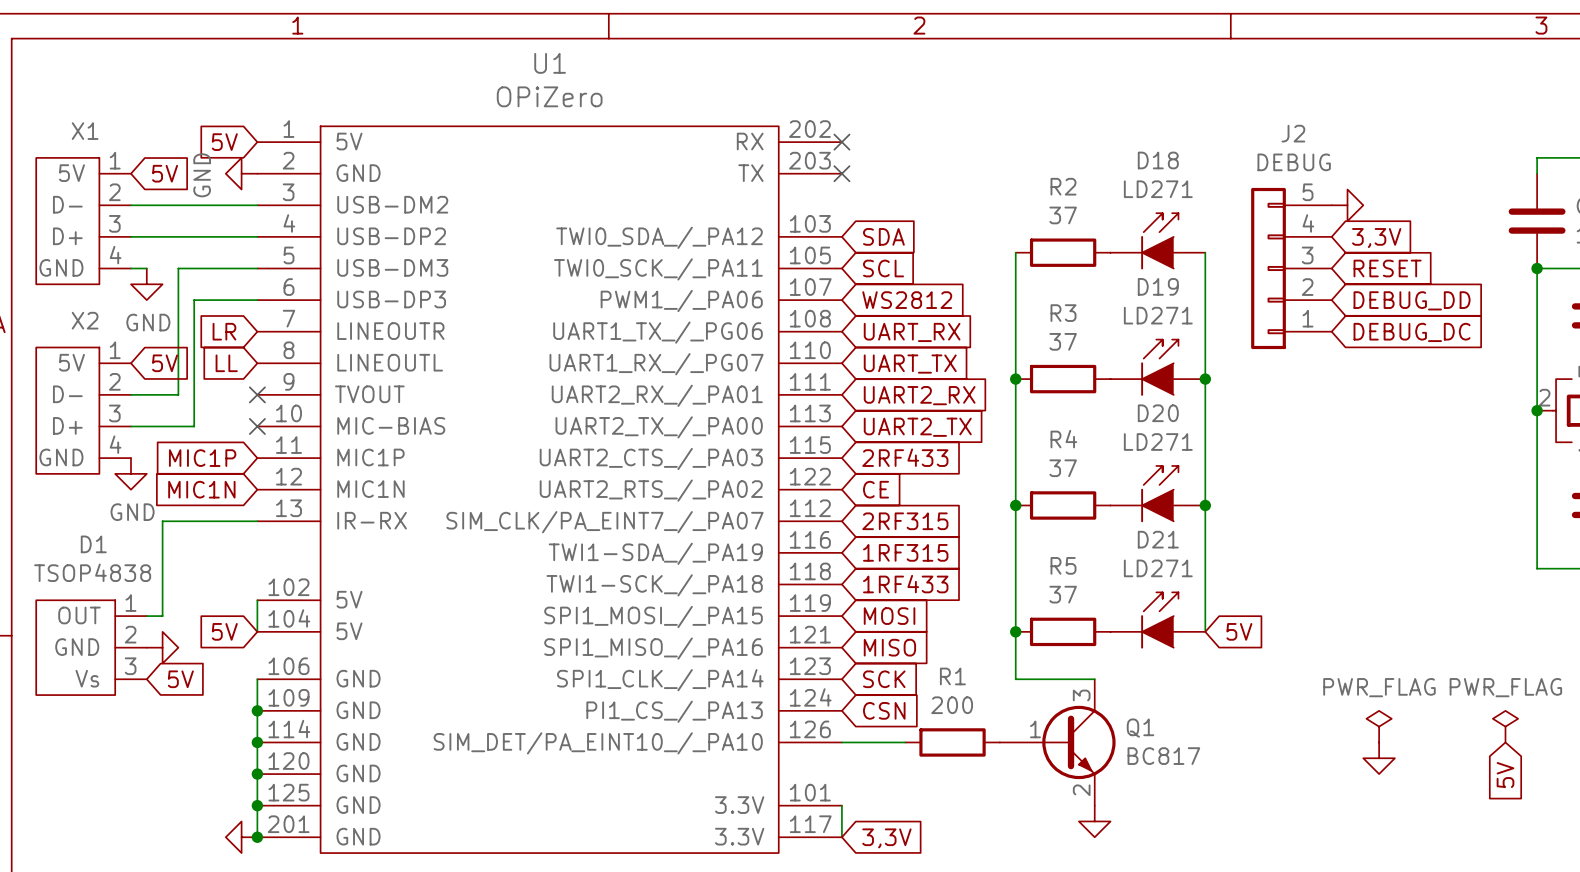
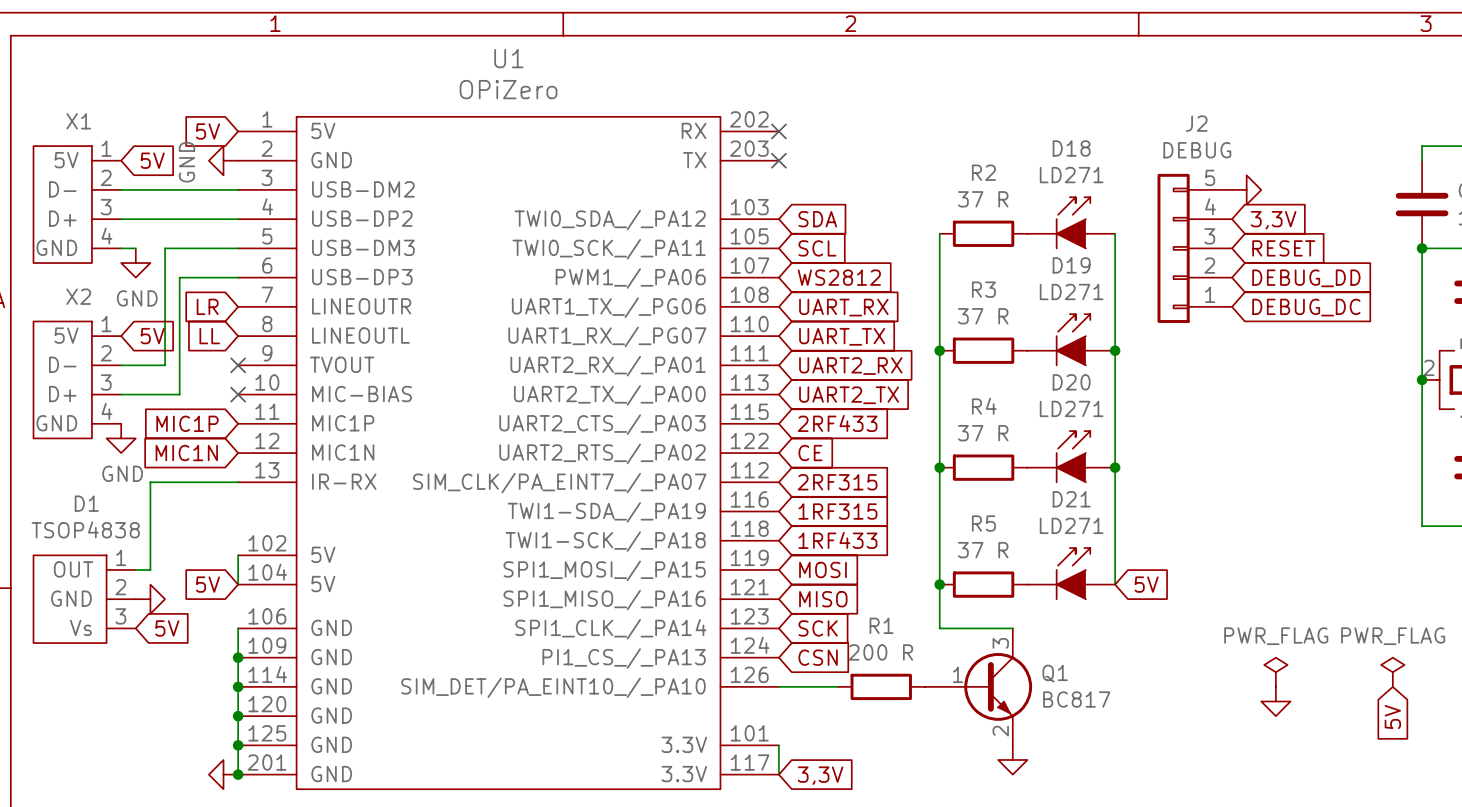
R2 value: 37 (1063, 215) -> 37 R (983, 199)
R3 value: 37 (1063, 341) -> 37 R (983, 316)
R4 value: 37 (1063, 468) -> 37 R (983, 433)
R5 value: 37 (1063, 594) -> 37 R (983, 550)
R1 value: 200 (952, 705) -> 200 R (880, 652)

